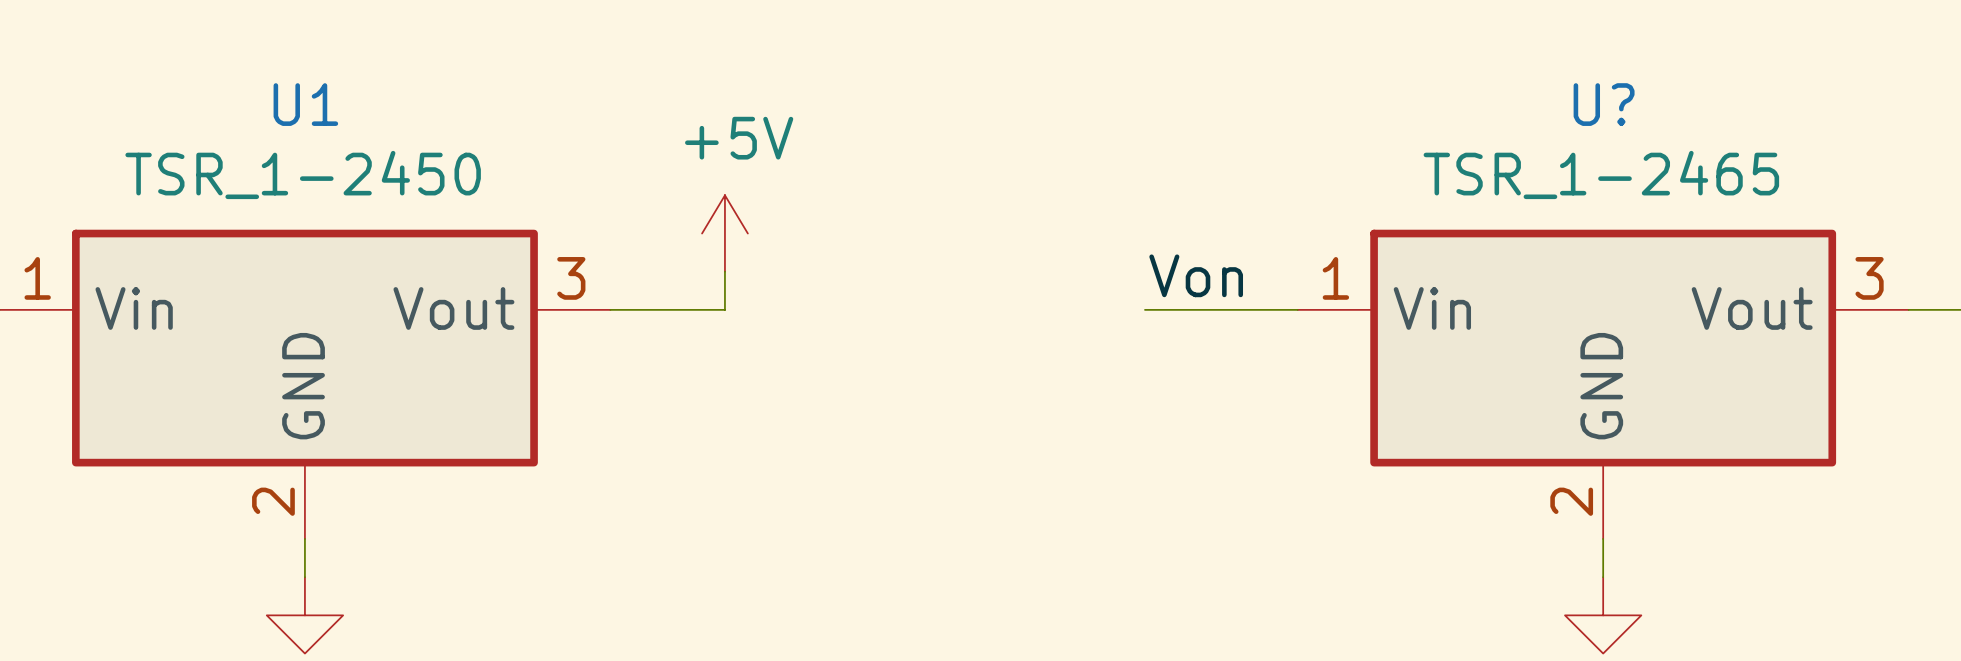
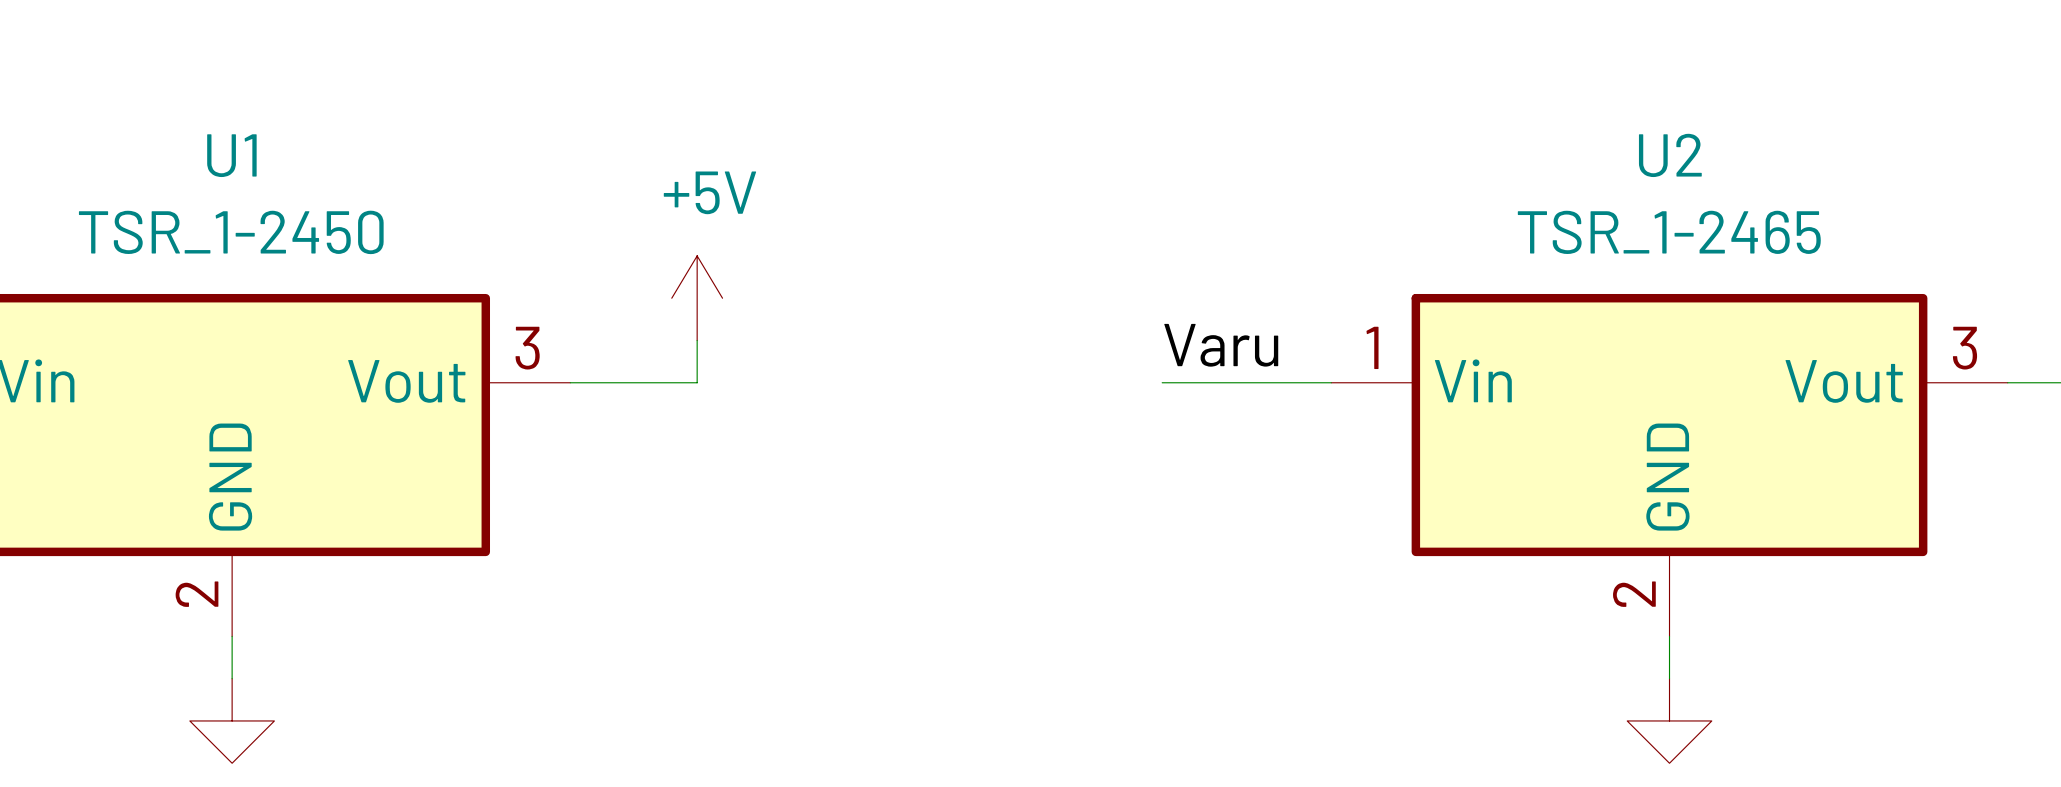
U? name: U? (1604, 104) -> U2 (1670, 155)
label: Von (1196, 275) -> Varu (1221, 345)

